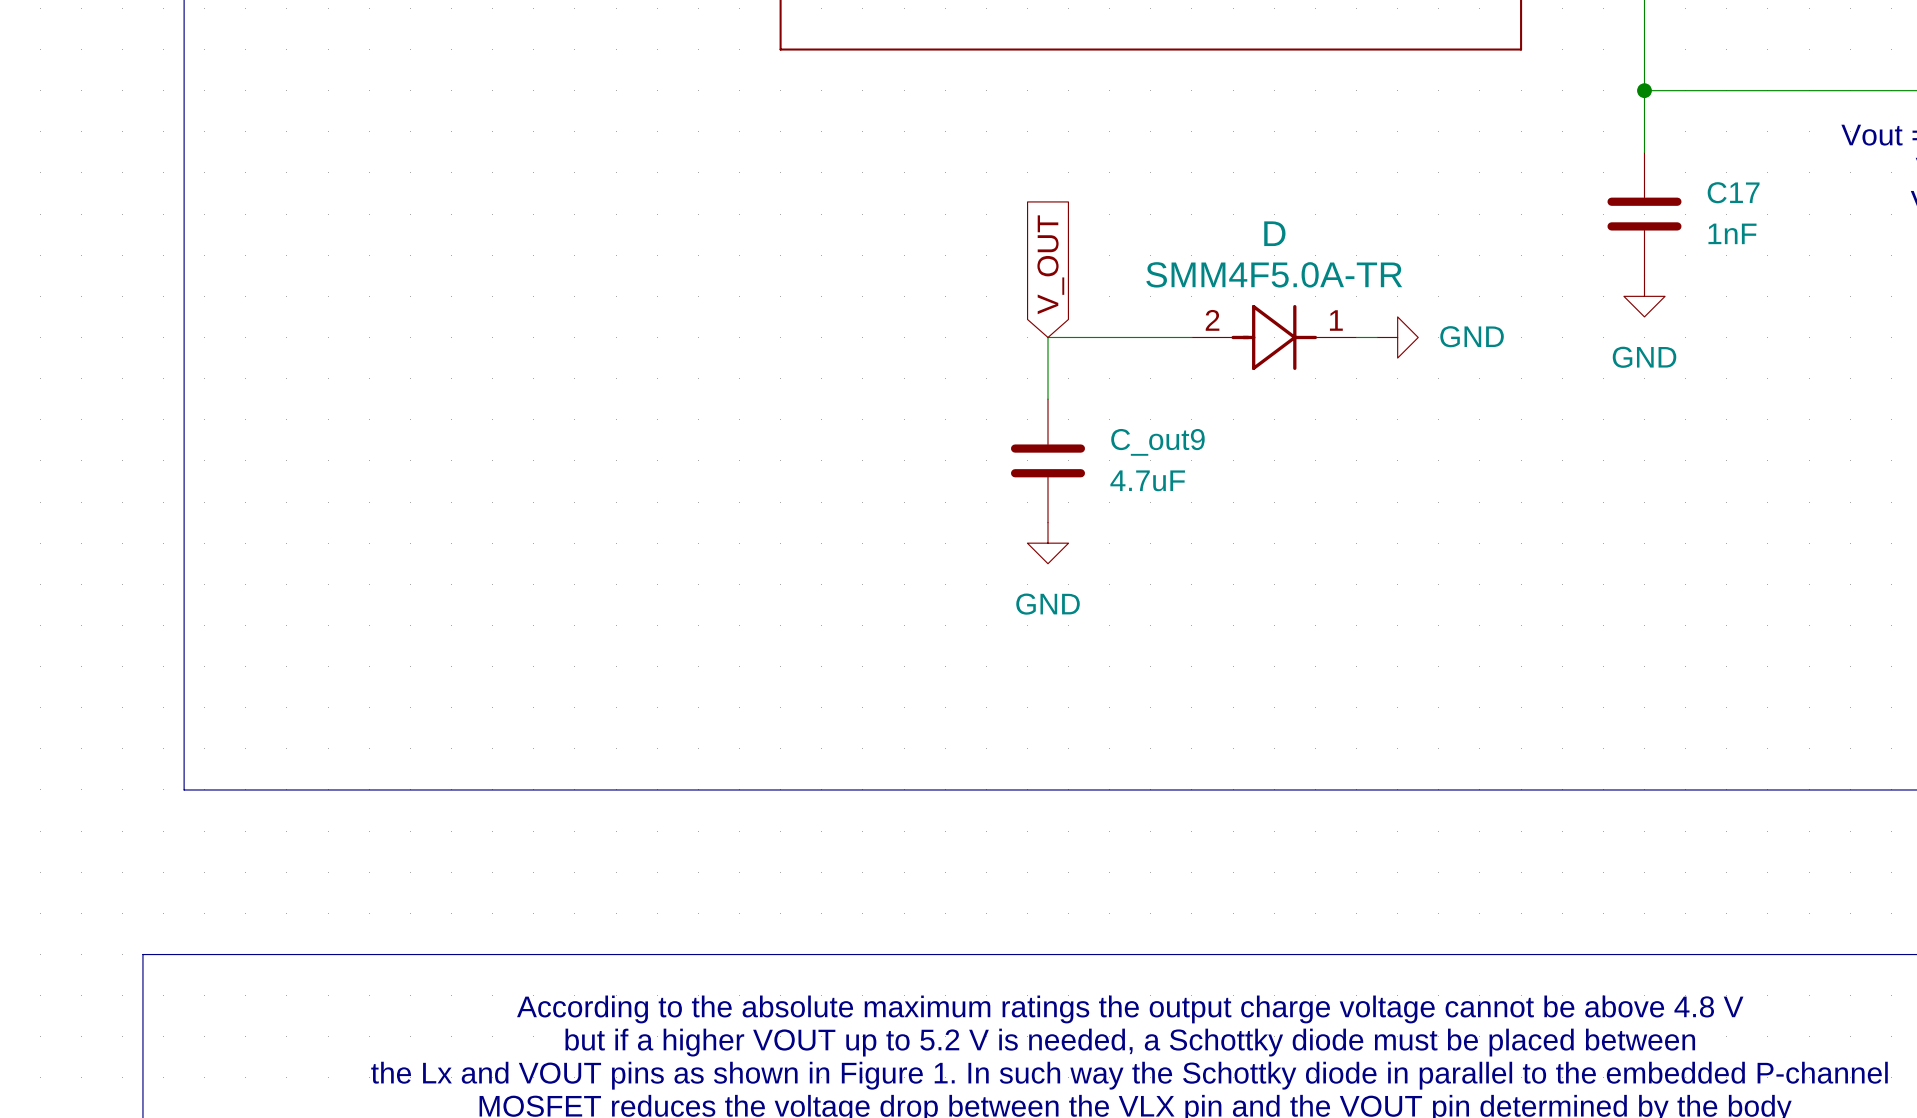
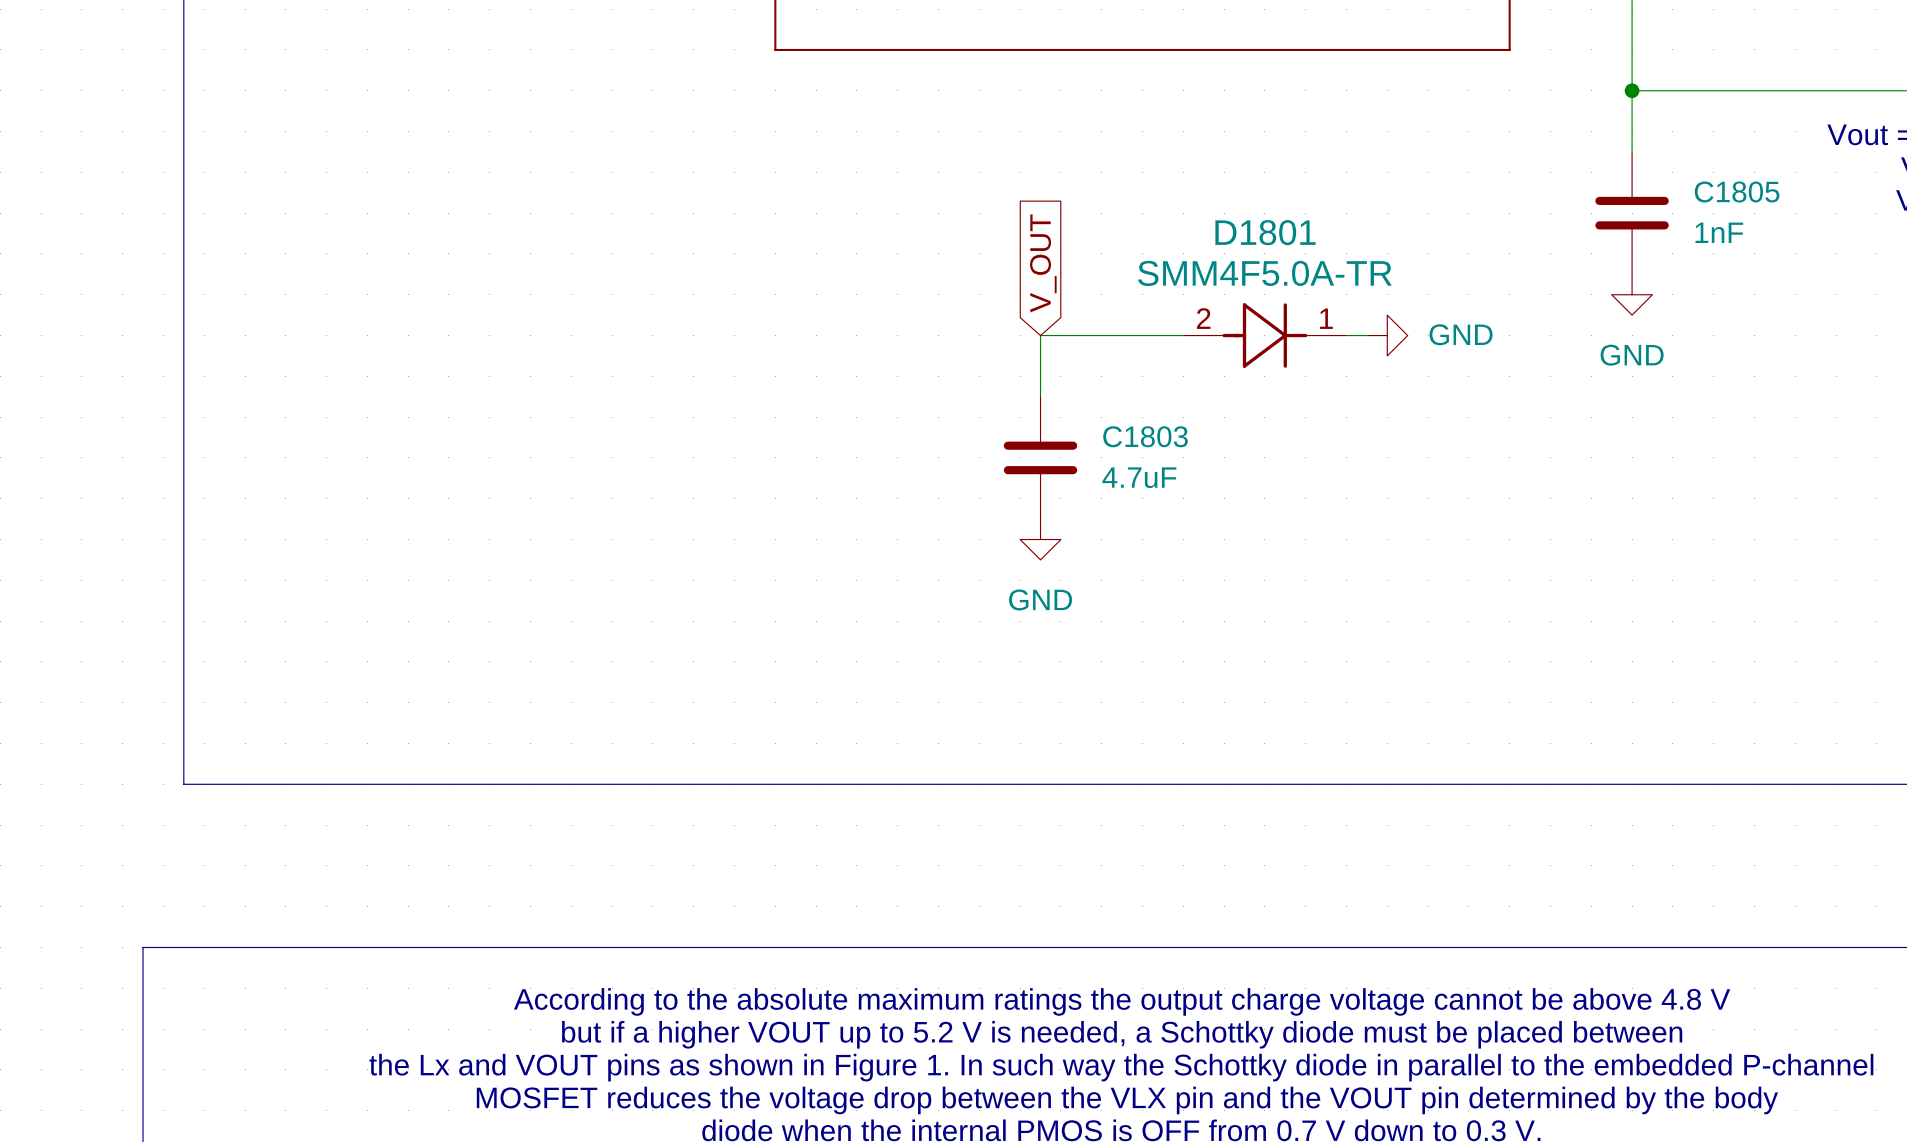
C17 name: C17 (1733, 192) -> C1805 (1737, 191)
D name: D (1274, 233) -> D1801 (1265, 232)
C_out9 name: C_out9 (1157, 442) -> C1803 (1145, 436)

